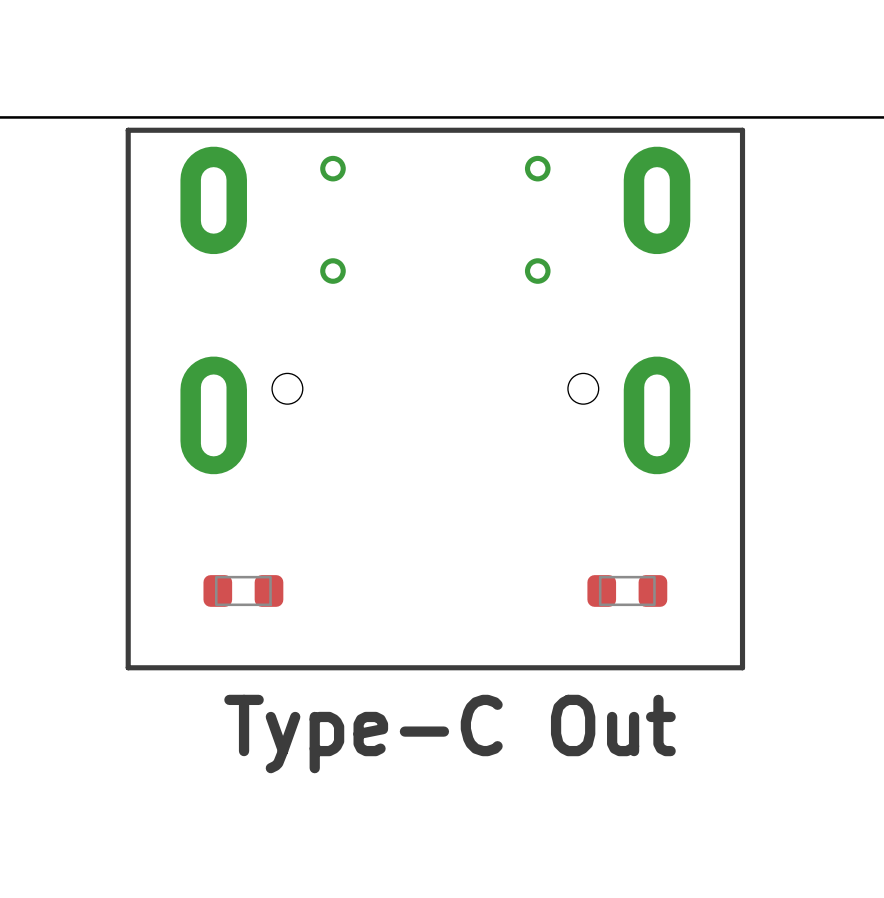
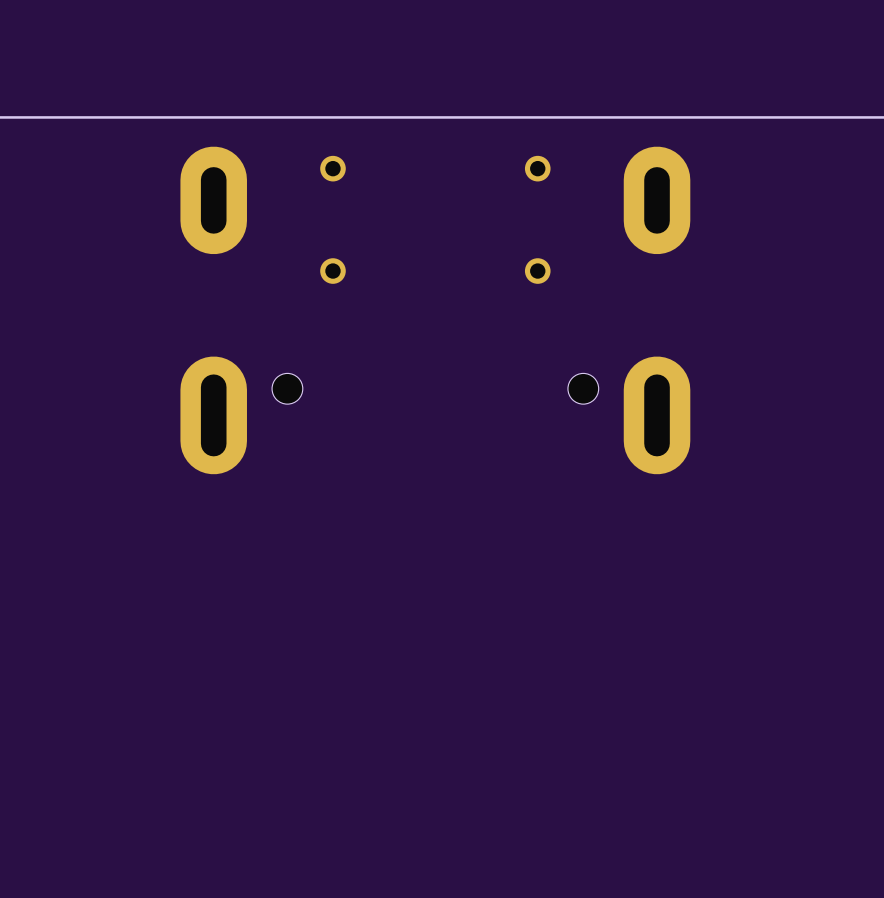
line: (128, 130) (742, 130) (742, 667) (128, 667) (128, 130) -> none
part: (243, 590) -> none
part: (627, 590) -> none
text: Type-C Out (450, 734) -> none

